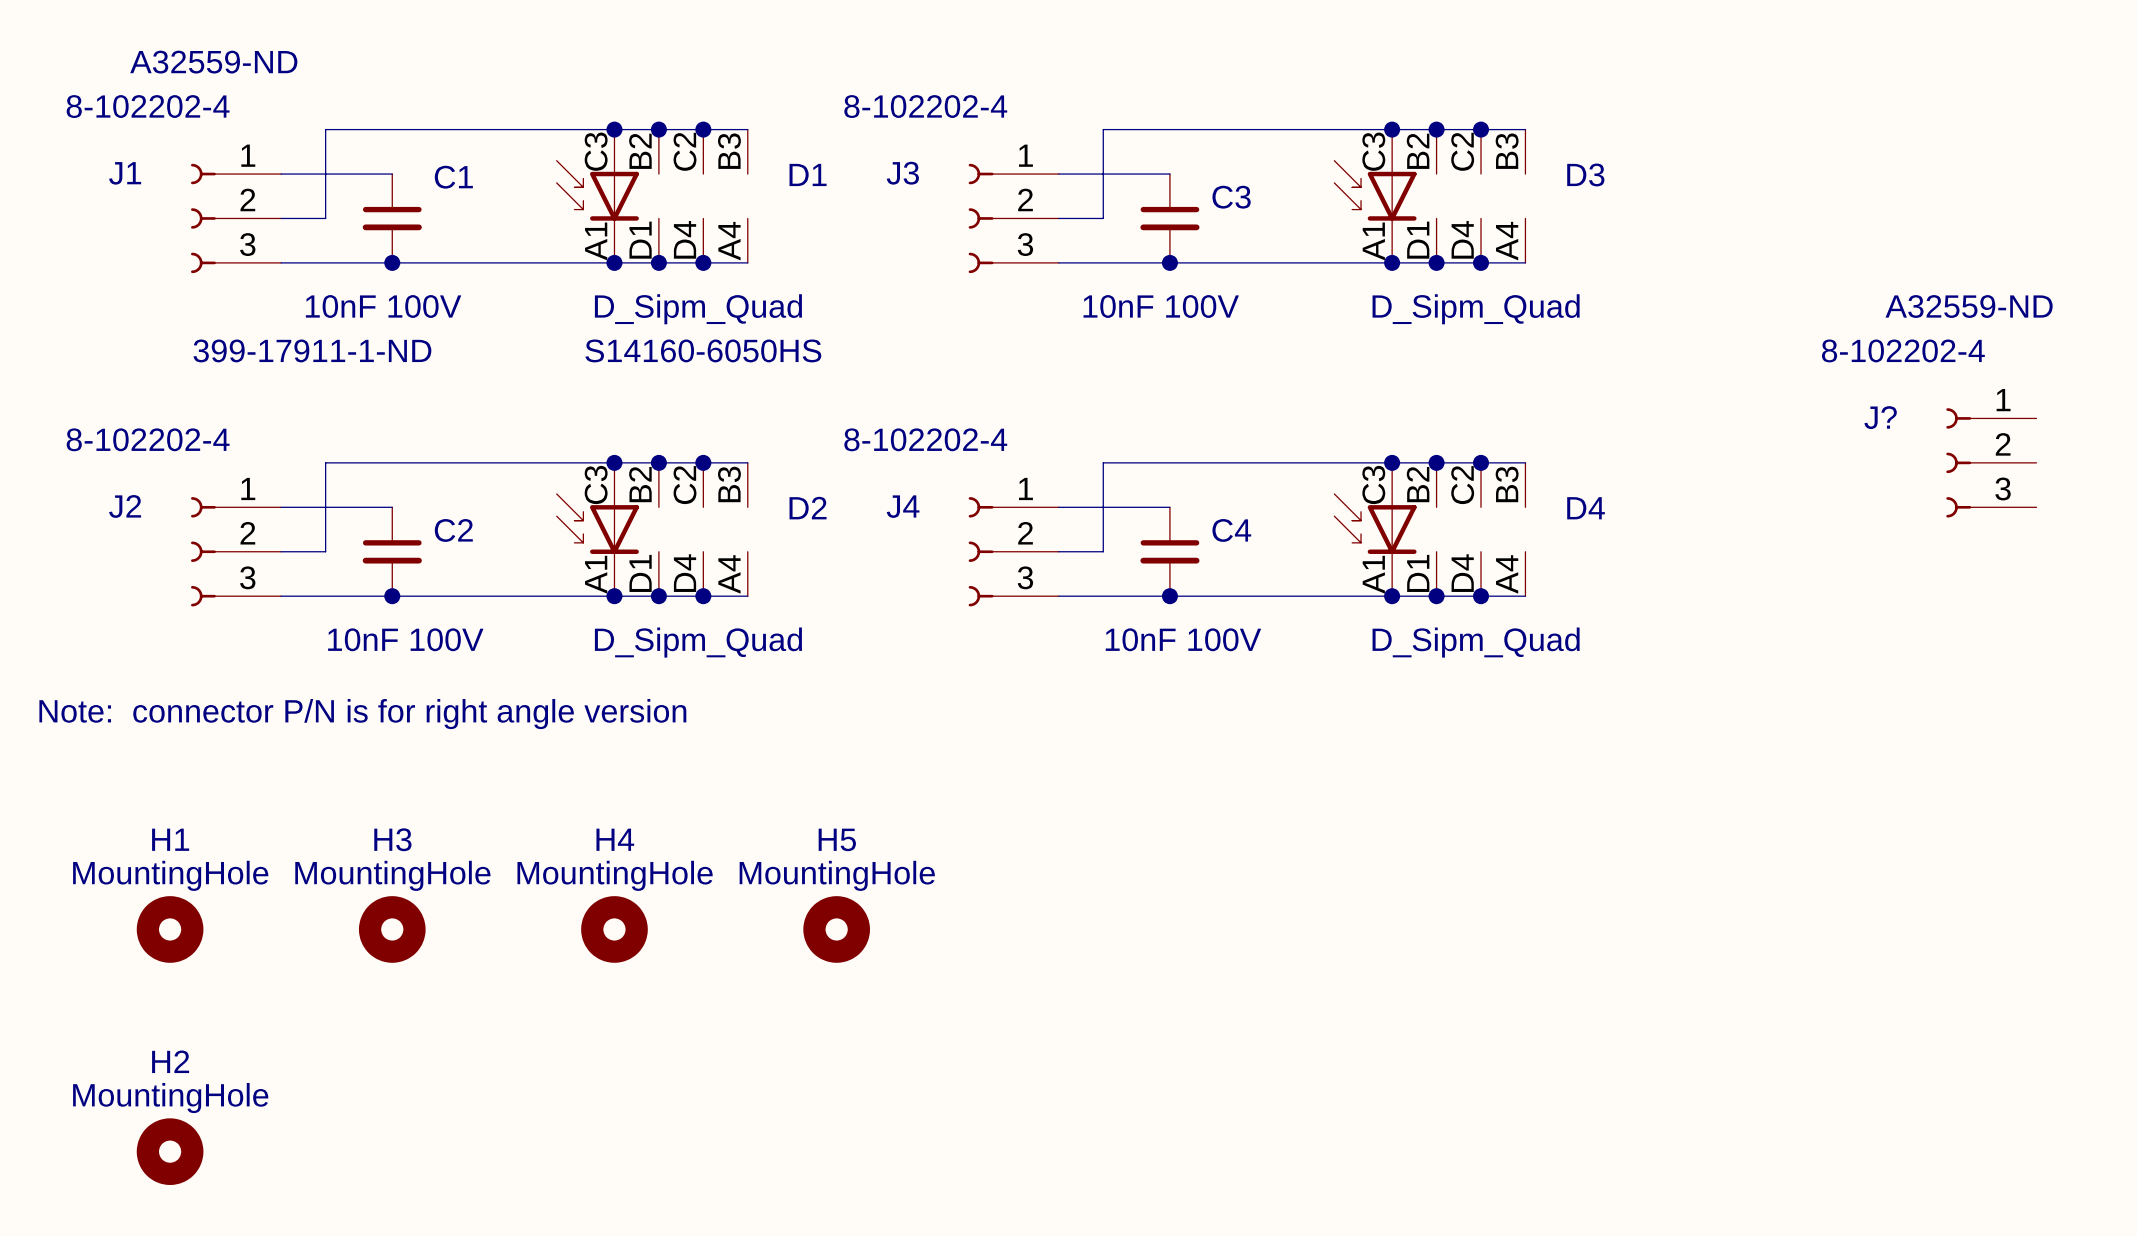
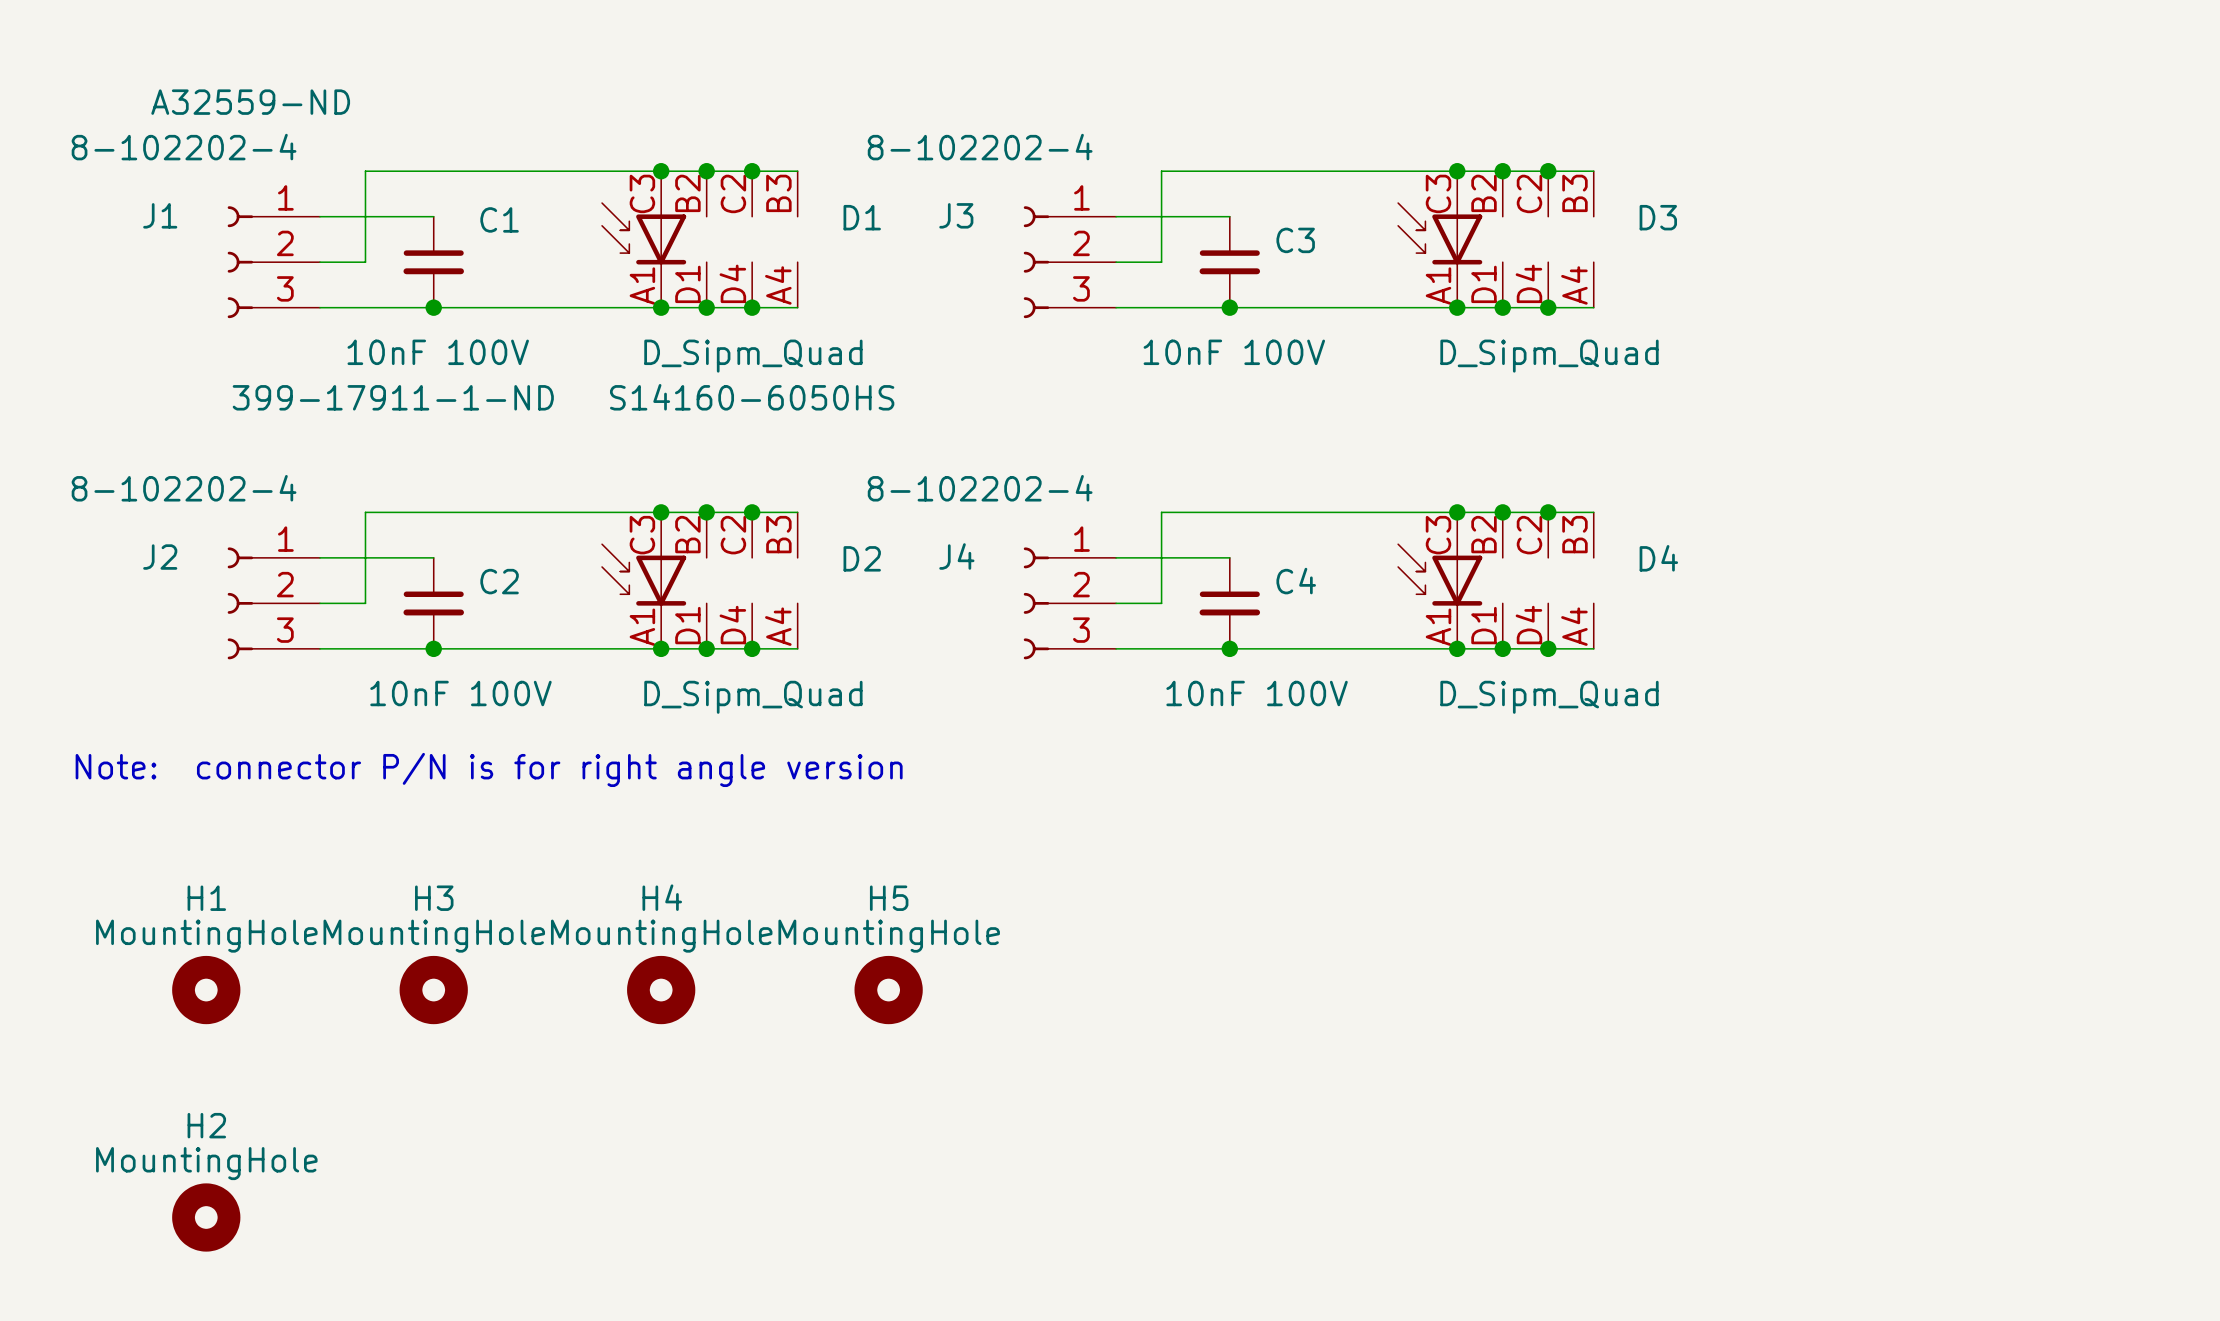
J?: 8-102202-4 (1991, 462) -> none

